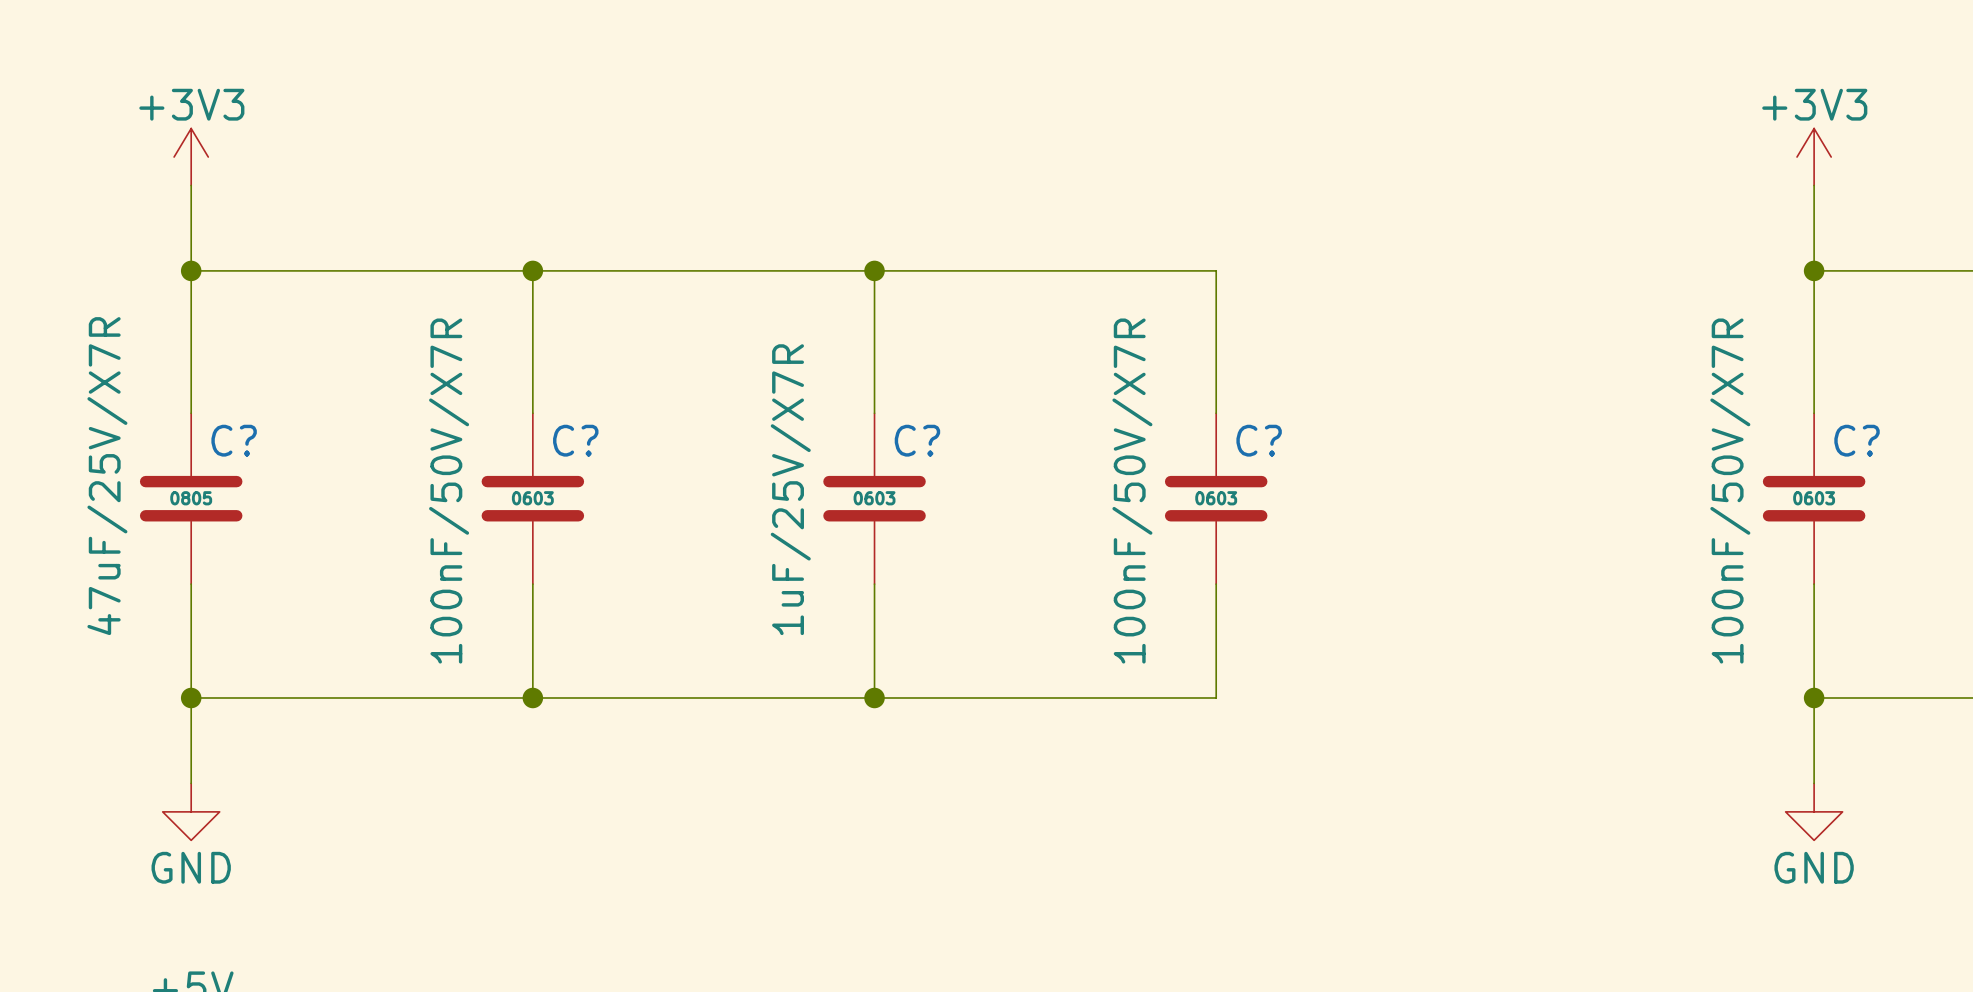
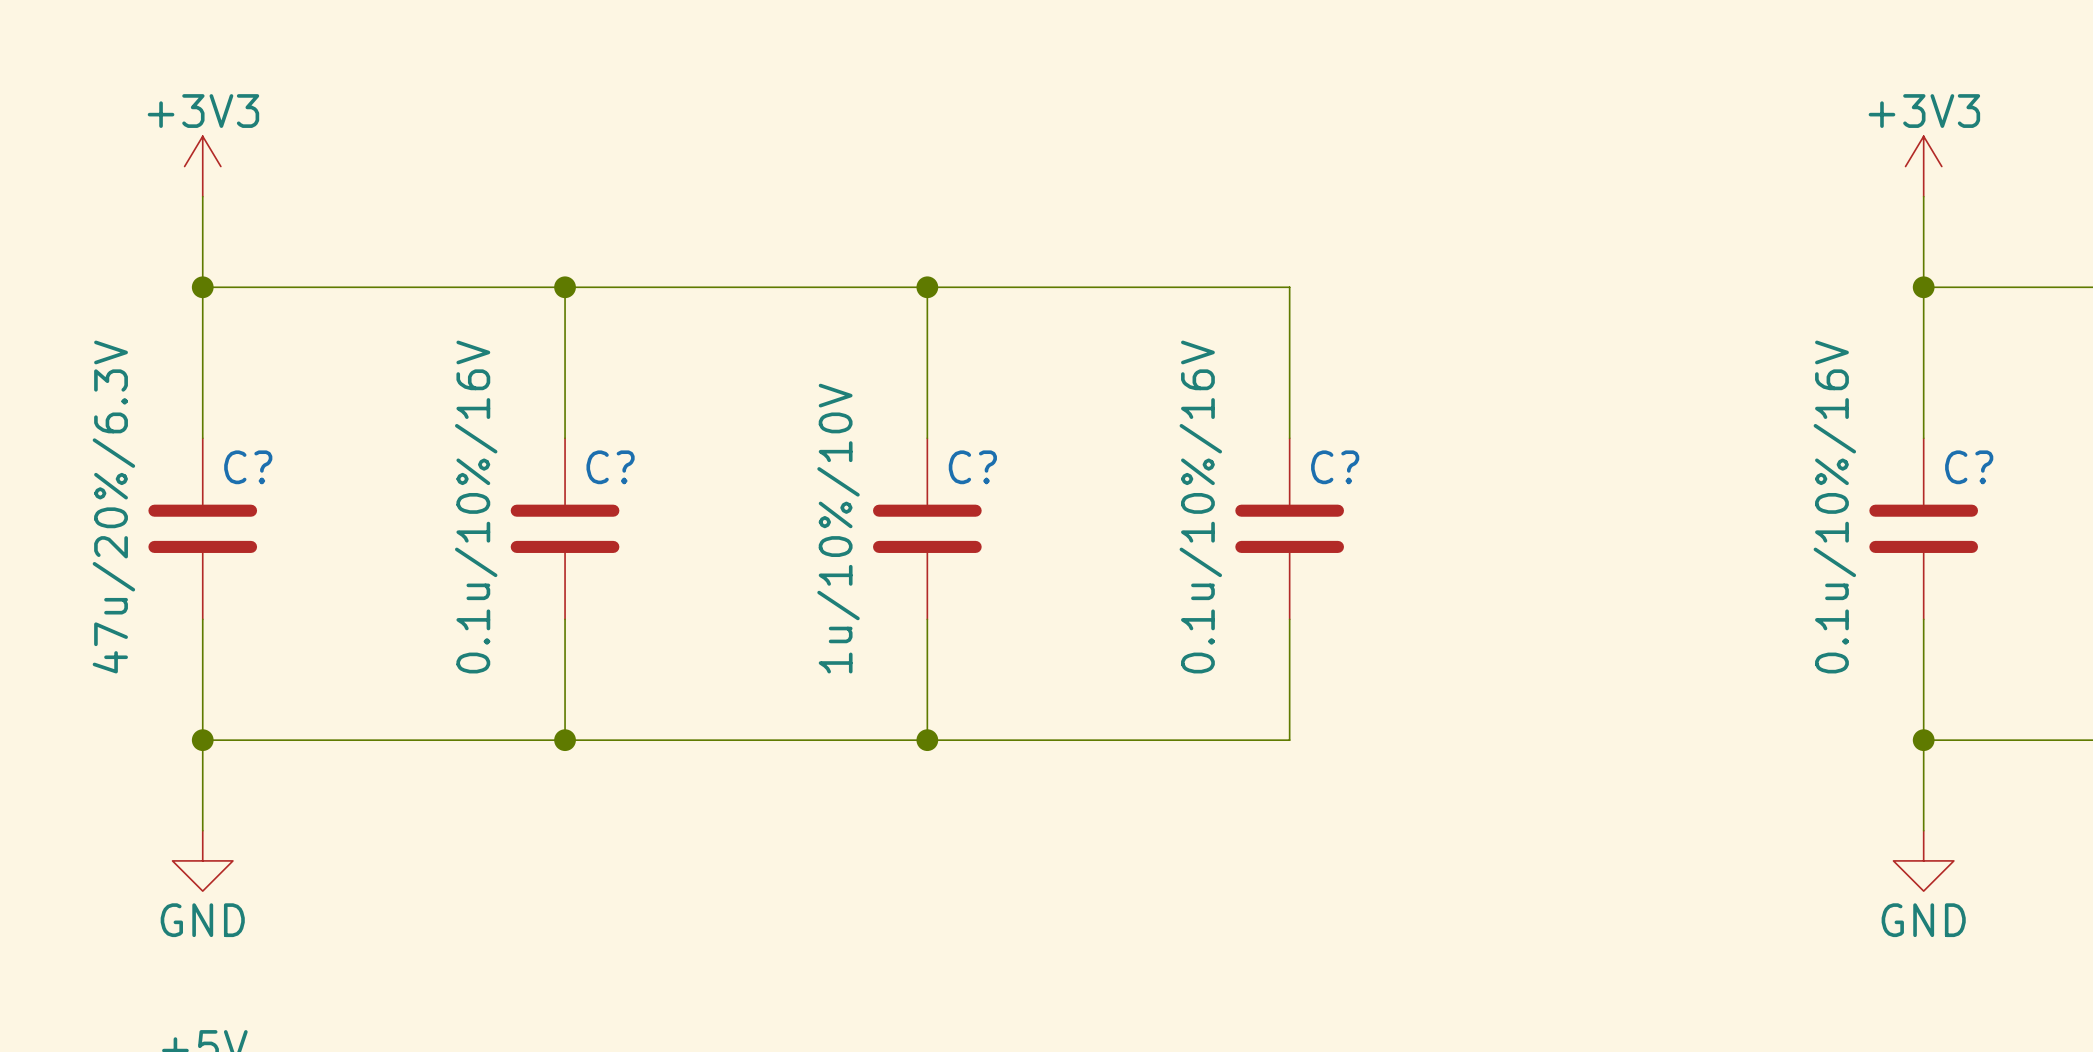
C? value: 47uF/25V/X7R (107, 476) -> 47u/20%/6.3V (113, 507)
C? value: 1uF/25V/X7R (790, 489) -> 1u/10%/10V (838, 528)
C? value: 100nF/50V/X7R (449, 491) -> 0.1u/10%/16V (476, 507)
C? value: 100nF/50V/X7R (1132, 491) -> 0.1u/10%/16V (1200, 507)
C? value: 100nF/50V/X7R (1730, 491) -> 0.1u/10%/16V (1834, 507)
C? text: 0805 (191, 498) -> none
C? text: 0603 (532, 498) -> none
C? text: 0603 (874, 498) -> none
C? text: 0603 (1216, 498) -> none
C? text: 0603 (1814, 498) -> none

